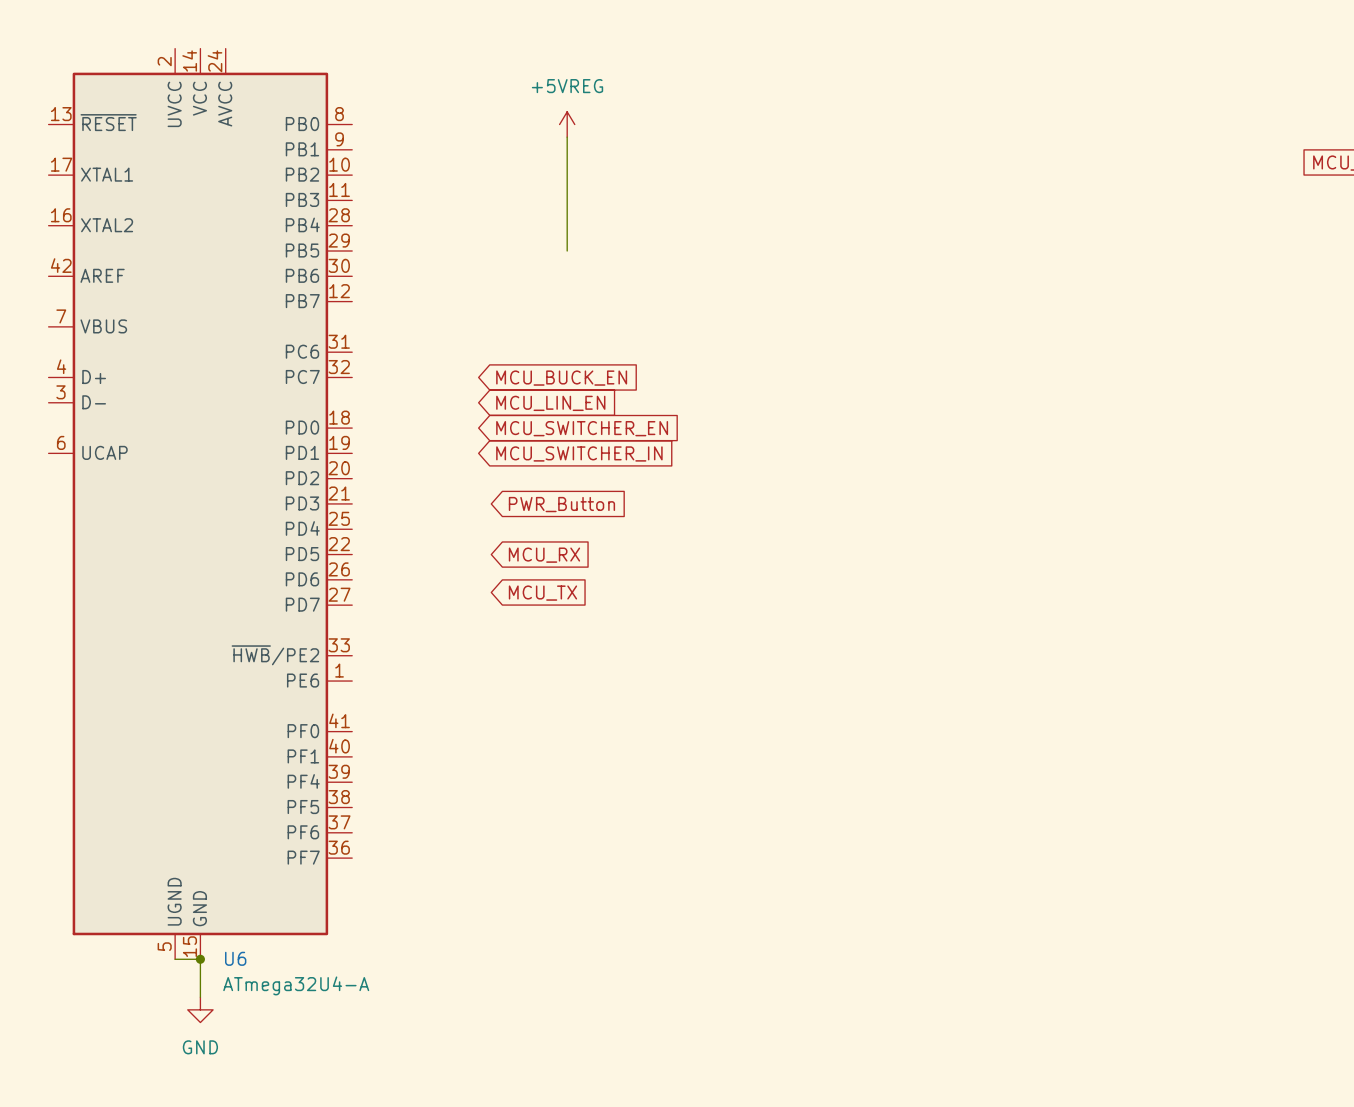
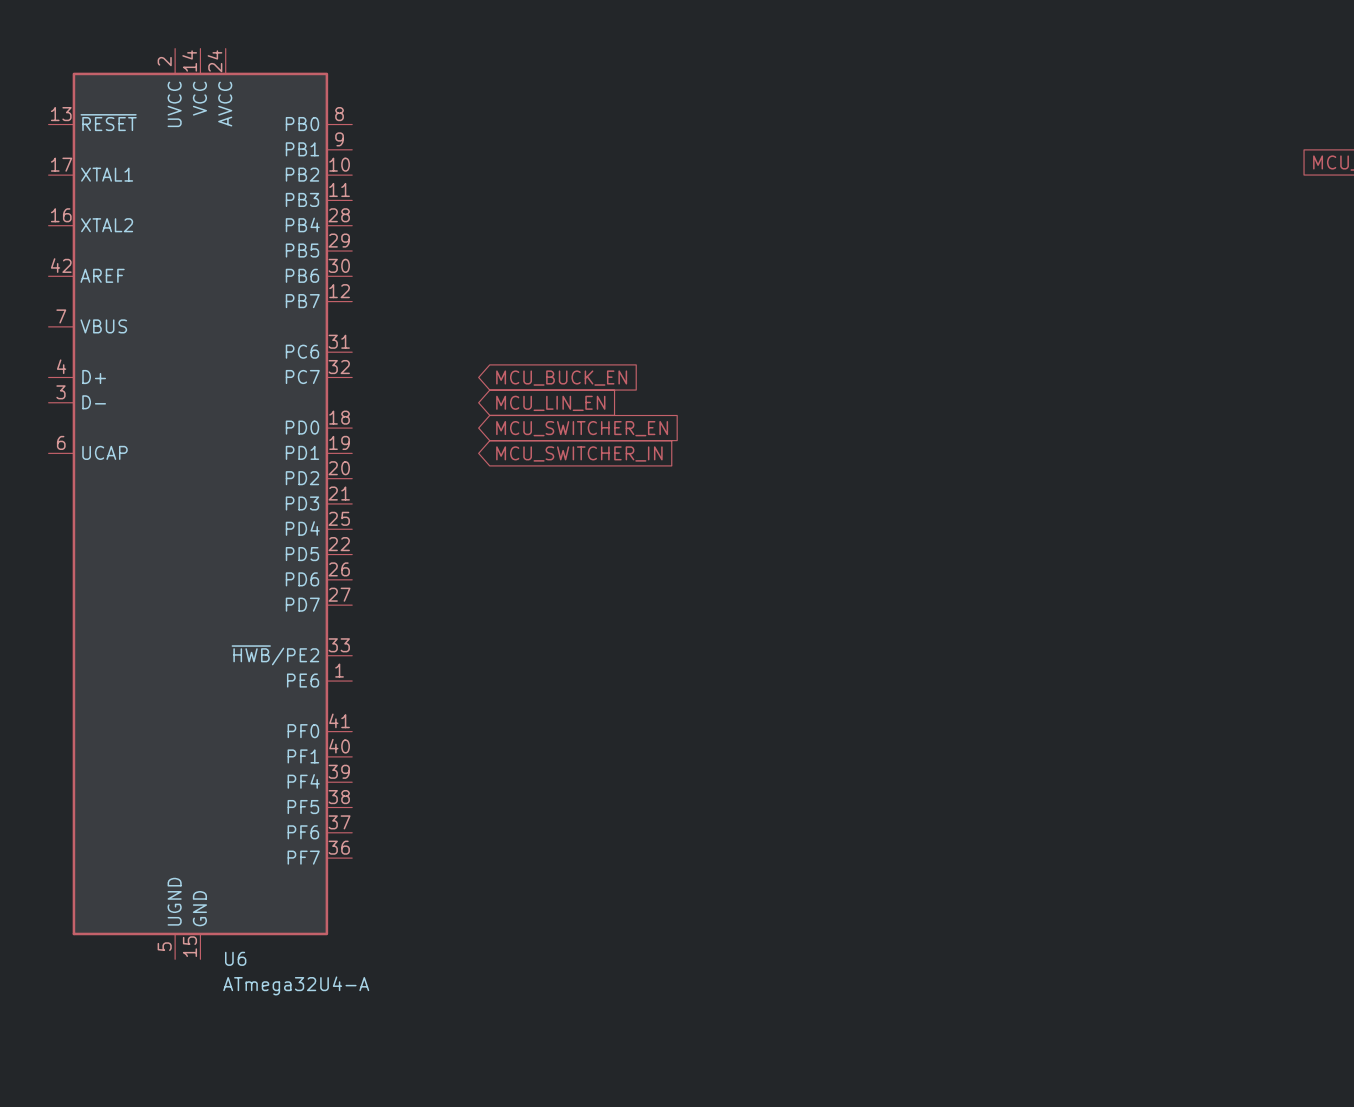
power symbol: +5VREG (567, 124) -> none
wire: (567, 137) (567, 251) -> none
global label: PWR_Button (561, 504) -> none
global label: MCU_RX (544, 555) -> none
global label: MCU_TX (542, 593) -> none
wire: (175, 959) (200, 959) (200, 997) -> none
junction: (200, 959) -> none
power symbol: GND (200, 1009) -> none

